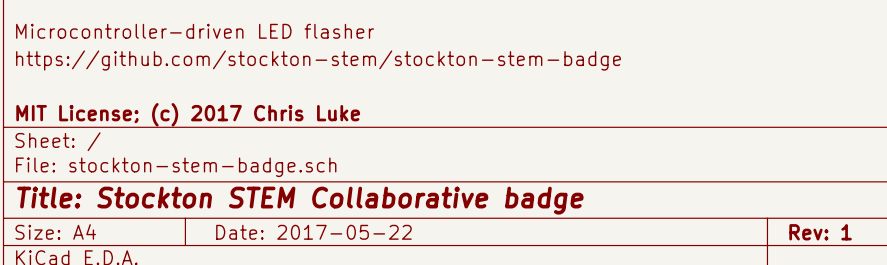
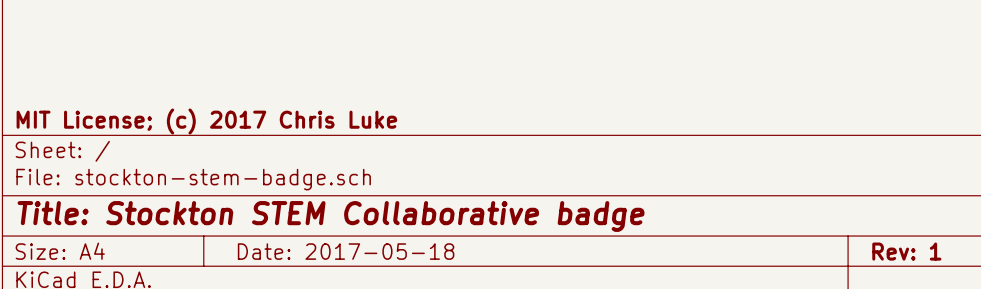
title block: Microcontroller-driven LED flasher (195, 31) -> none
title block: https://github.com/stockton-stem/stockton-stem-badge (318, 60) -> none
title block: Date: 2017-05-22 (313, 232) -> Date: 2017-05-18 (346, 251)

